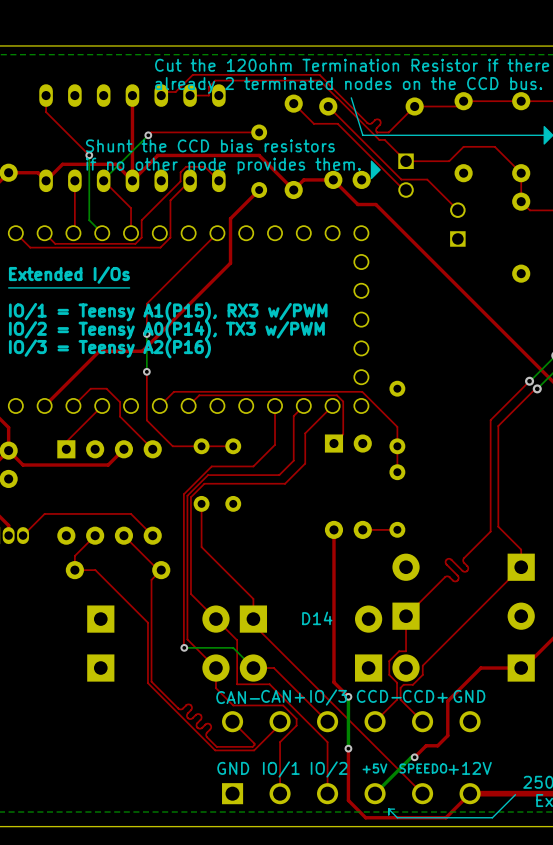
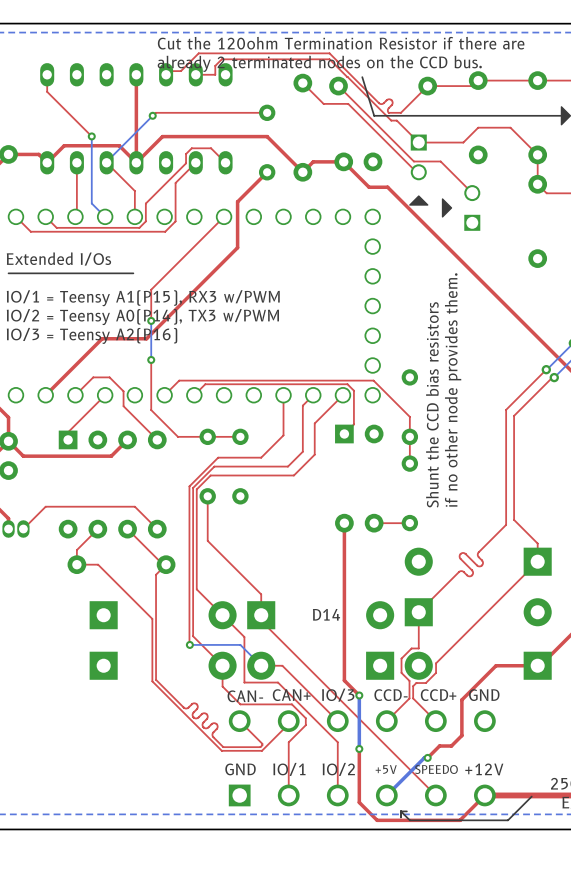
text: Shunt the CCD bias resistors (210, 145) -> none
text: if no other node provides them. (223, 166) -> none
drawing position: (375, 169) -> (447, 207)
drawing: none -> [409, 195, 429, 206]
text: none -> if no other node provides them. (453, 389)
text: none -> Shunt the CCD bias resistors (432, 404)

